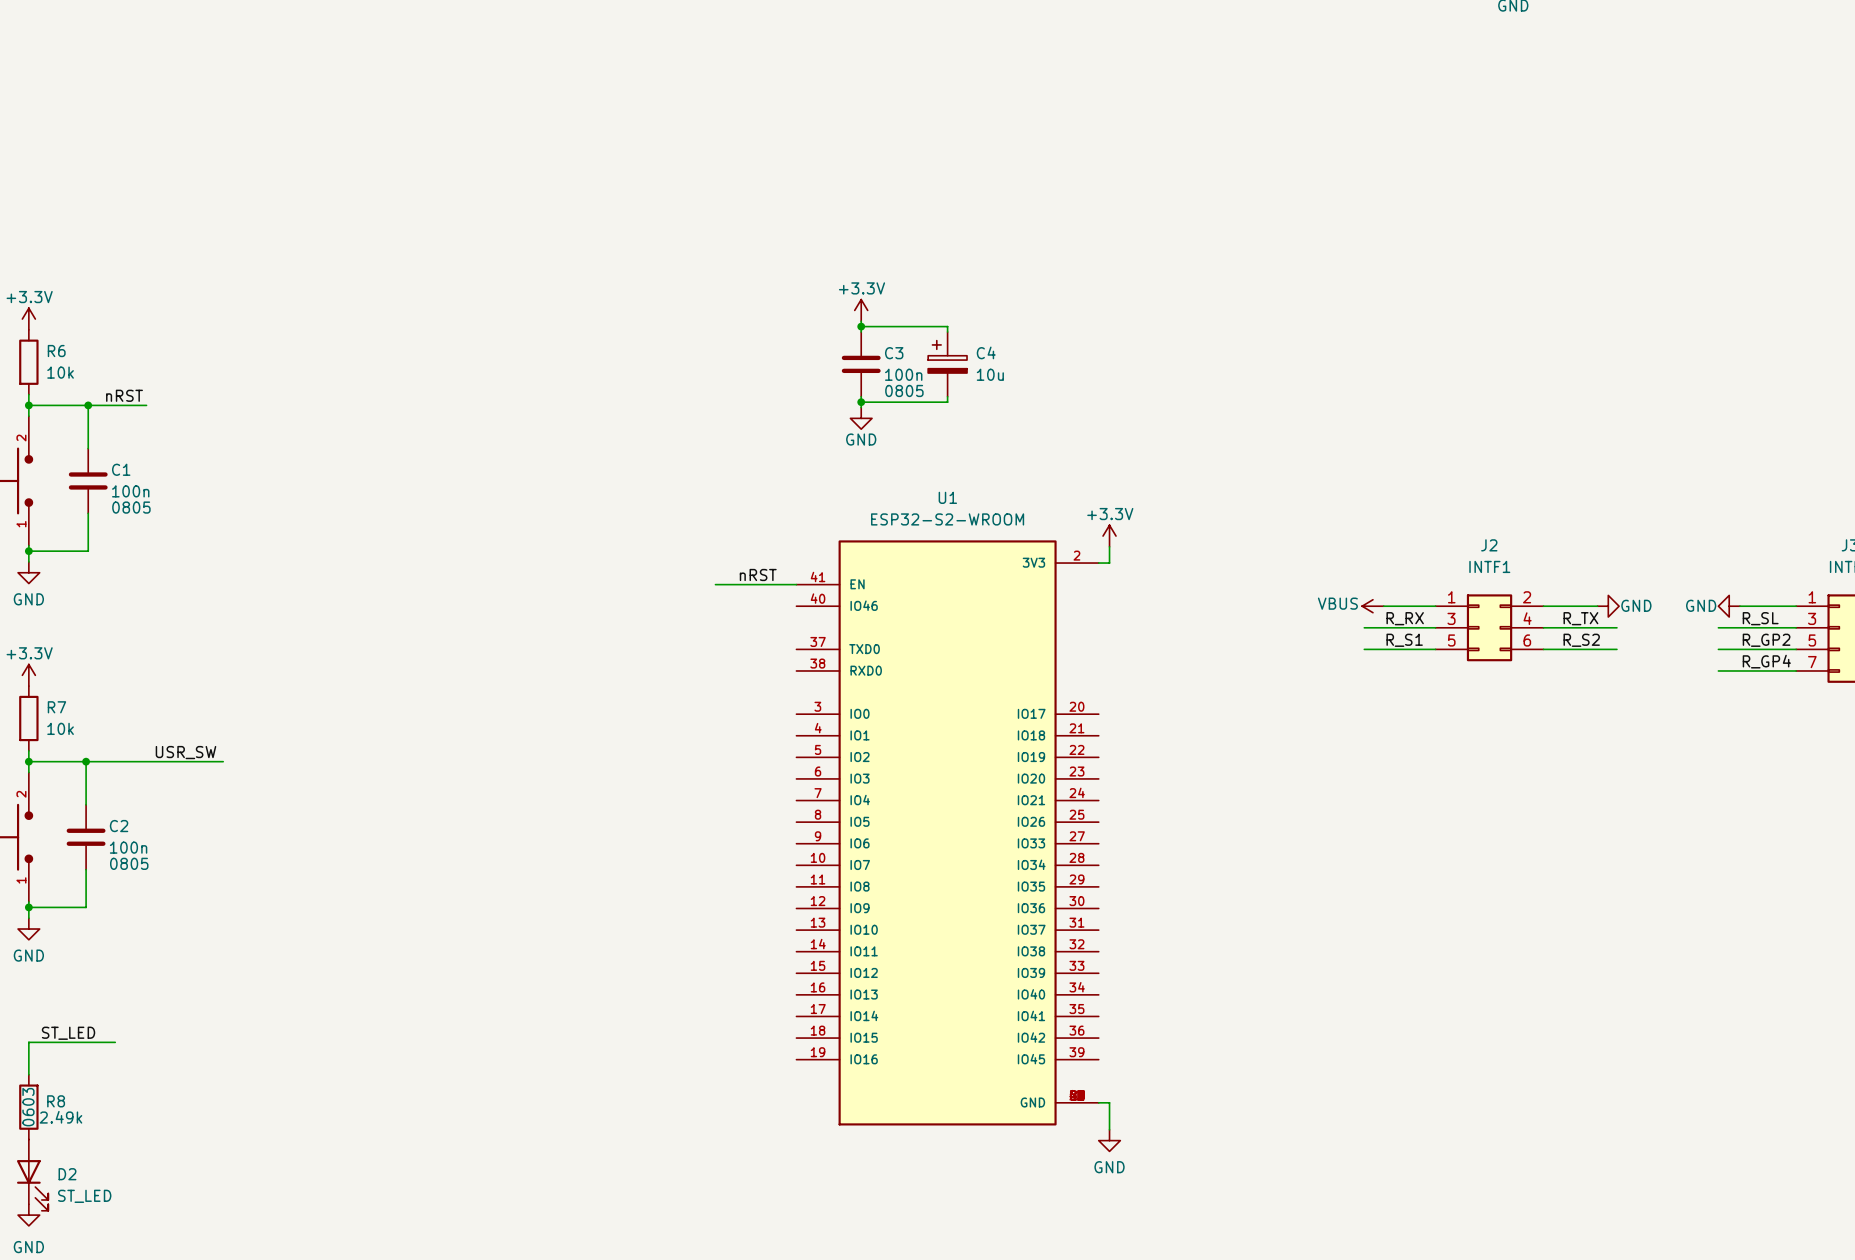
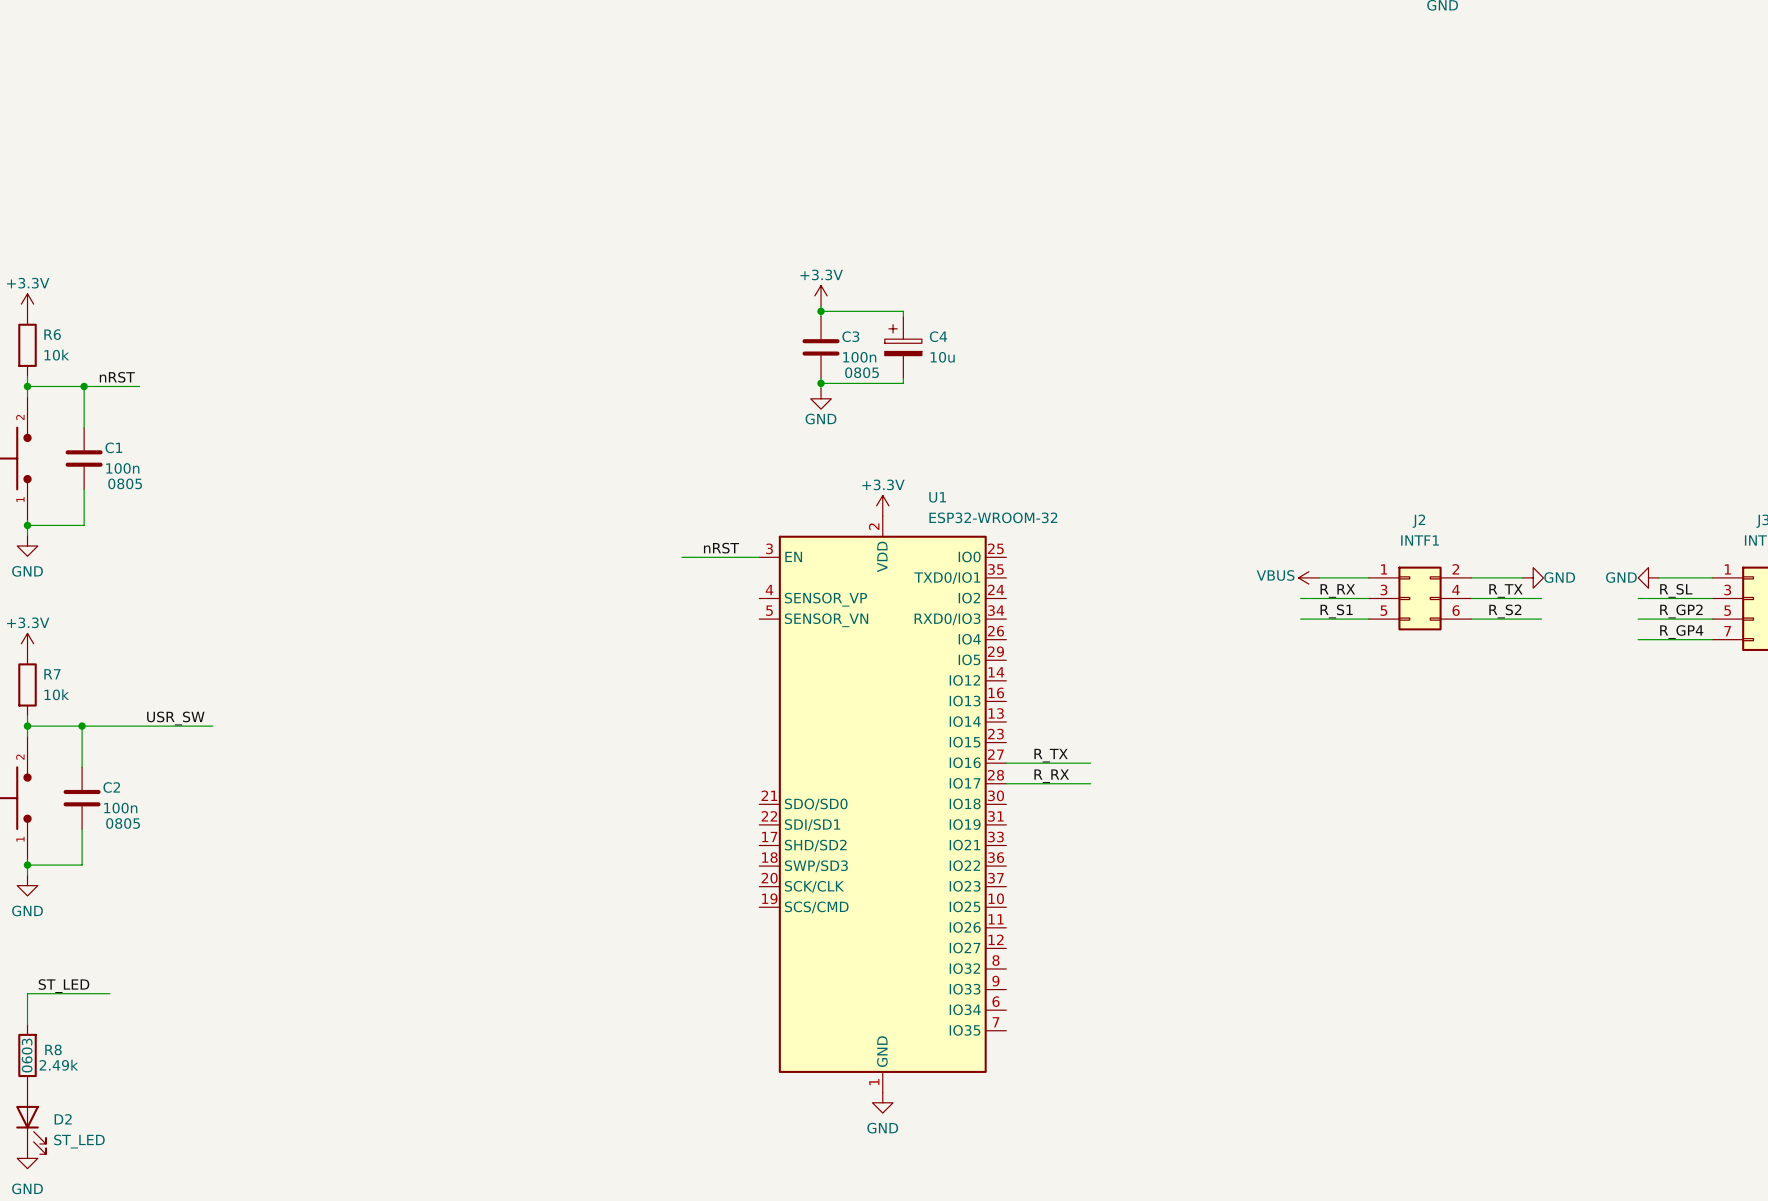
U1 name position: U1 (947, 497) -> U1 (937, 497)
U1 value: ESP32-S2-WROOM (947, 519) -> ESP32-WROOM-32 (993, 517)
power symbol position: +3.3V (1109, 536) -> +3.3V (882, 505)
U1 symbol: [796, 540, 1099, 1126] -> [759, 516, 1007, 1093]
wire: (1109, 546) (1109, 563) (1098, 563) -> none
label: none -> R_TX (1051, 755)
wire: none -> (1006, 763) (1090, 763)
label: none -> R_RX (1051, 776)
wire: none -> (1006, 783) (1090, 783)
wire: (1098, 1102) (1109, 1102) (1109, 1129) -> none
power symbol position: GND (1109, 1140) -> GND (882, 1102)

